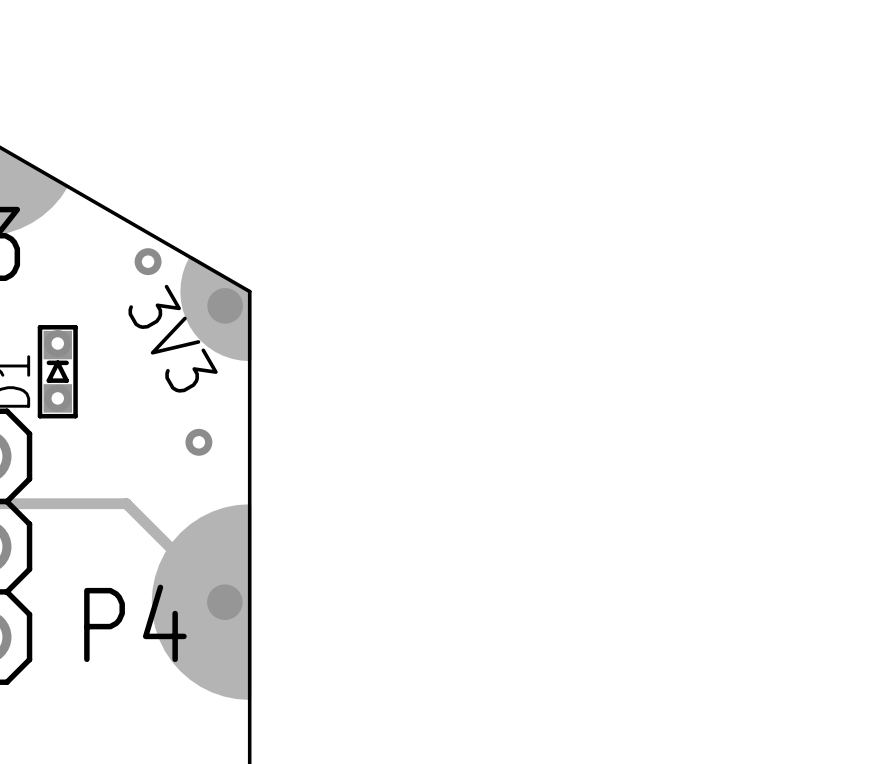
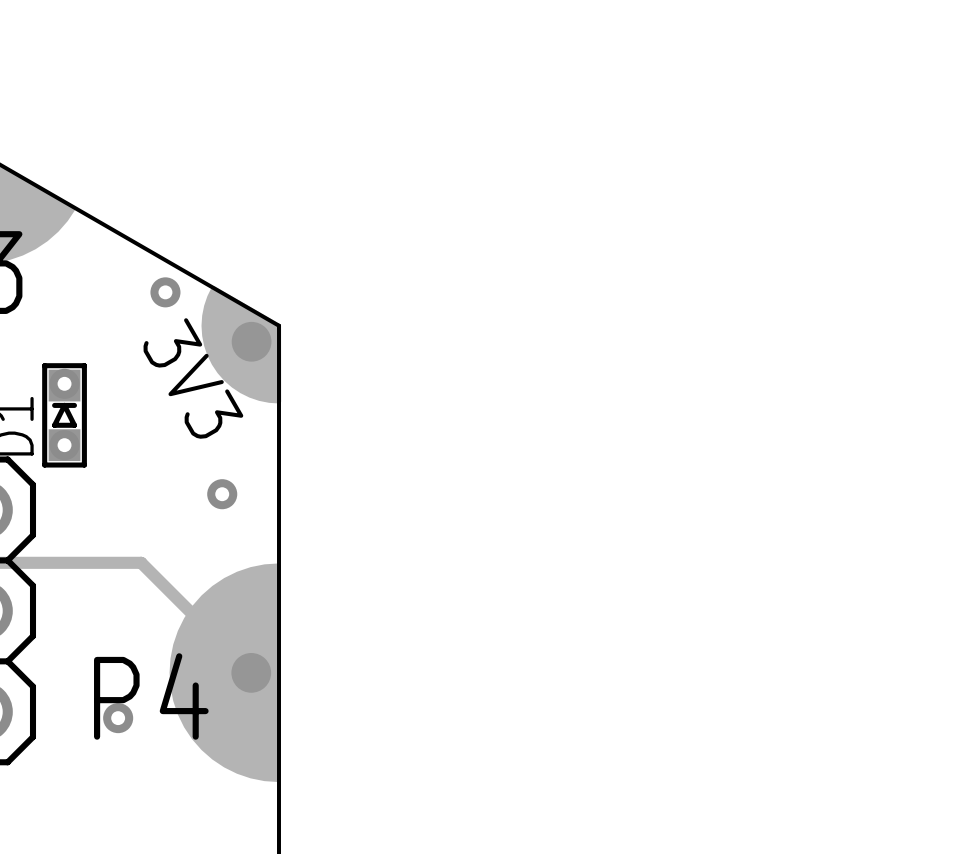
via: none -> (118, 718)

